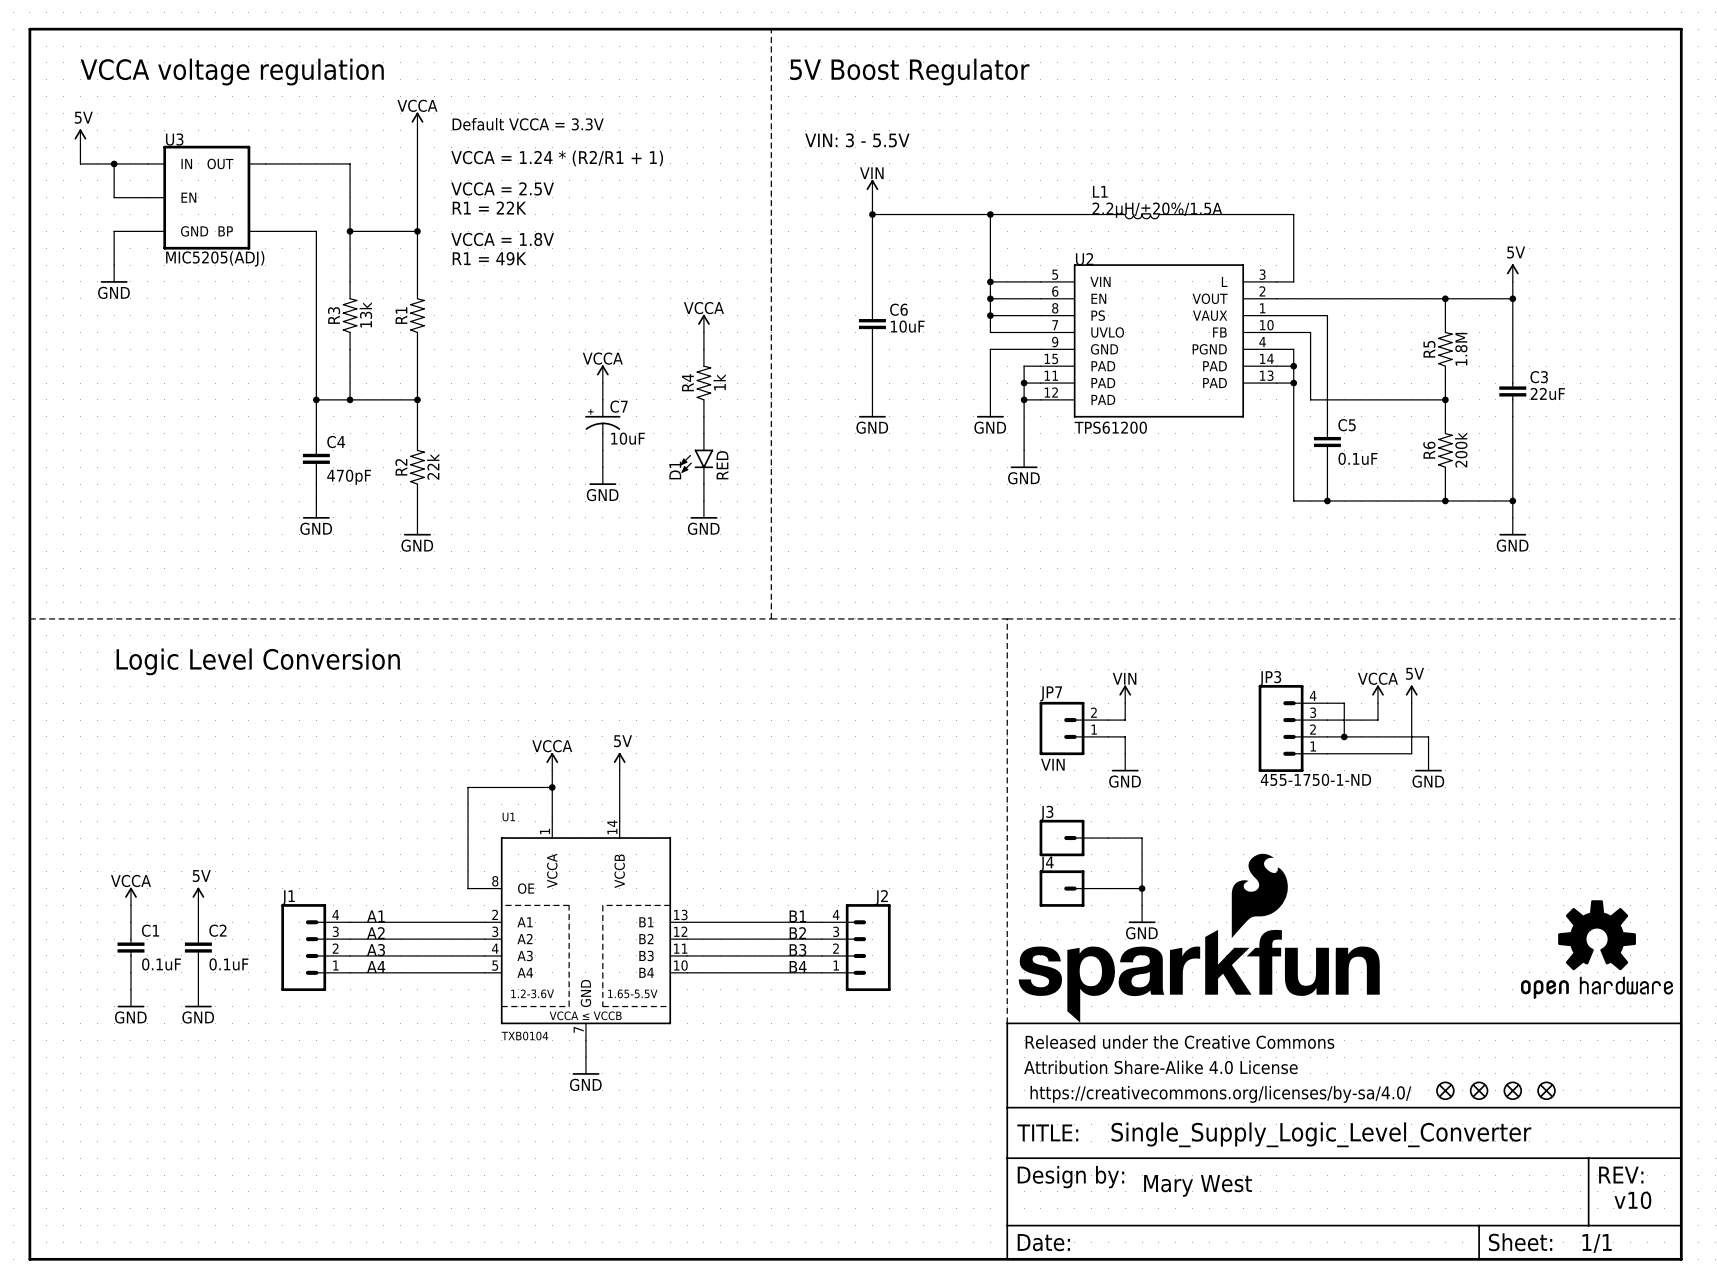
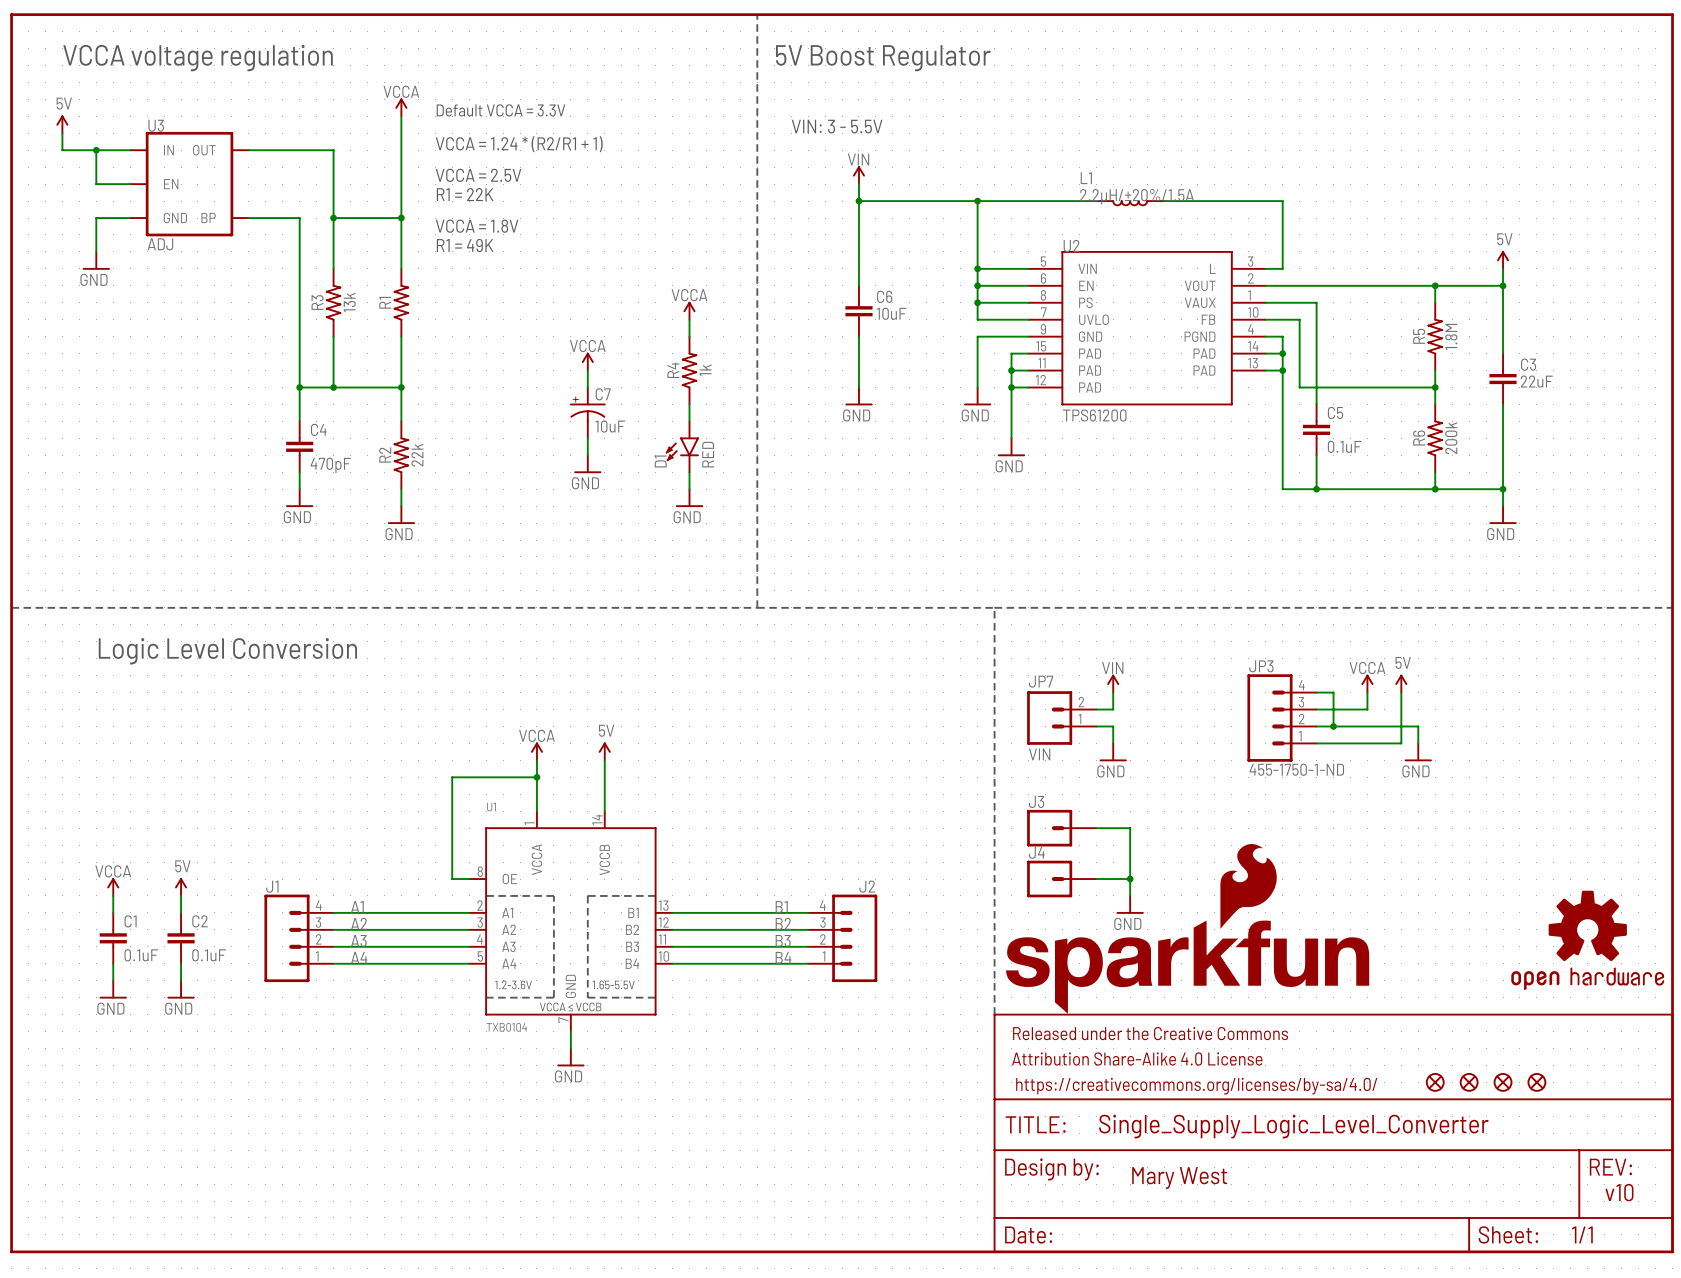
U3 value: MIC5205(ADJ) (215, 258) -> ADJ (160, 244)

